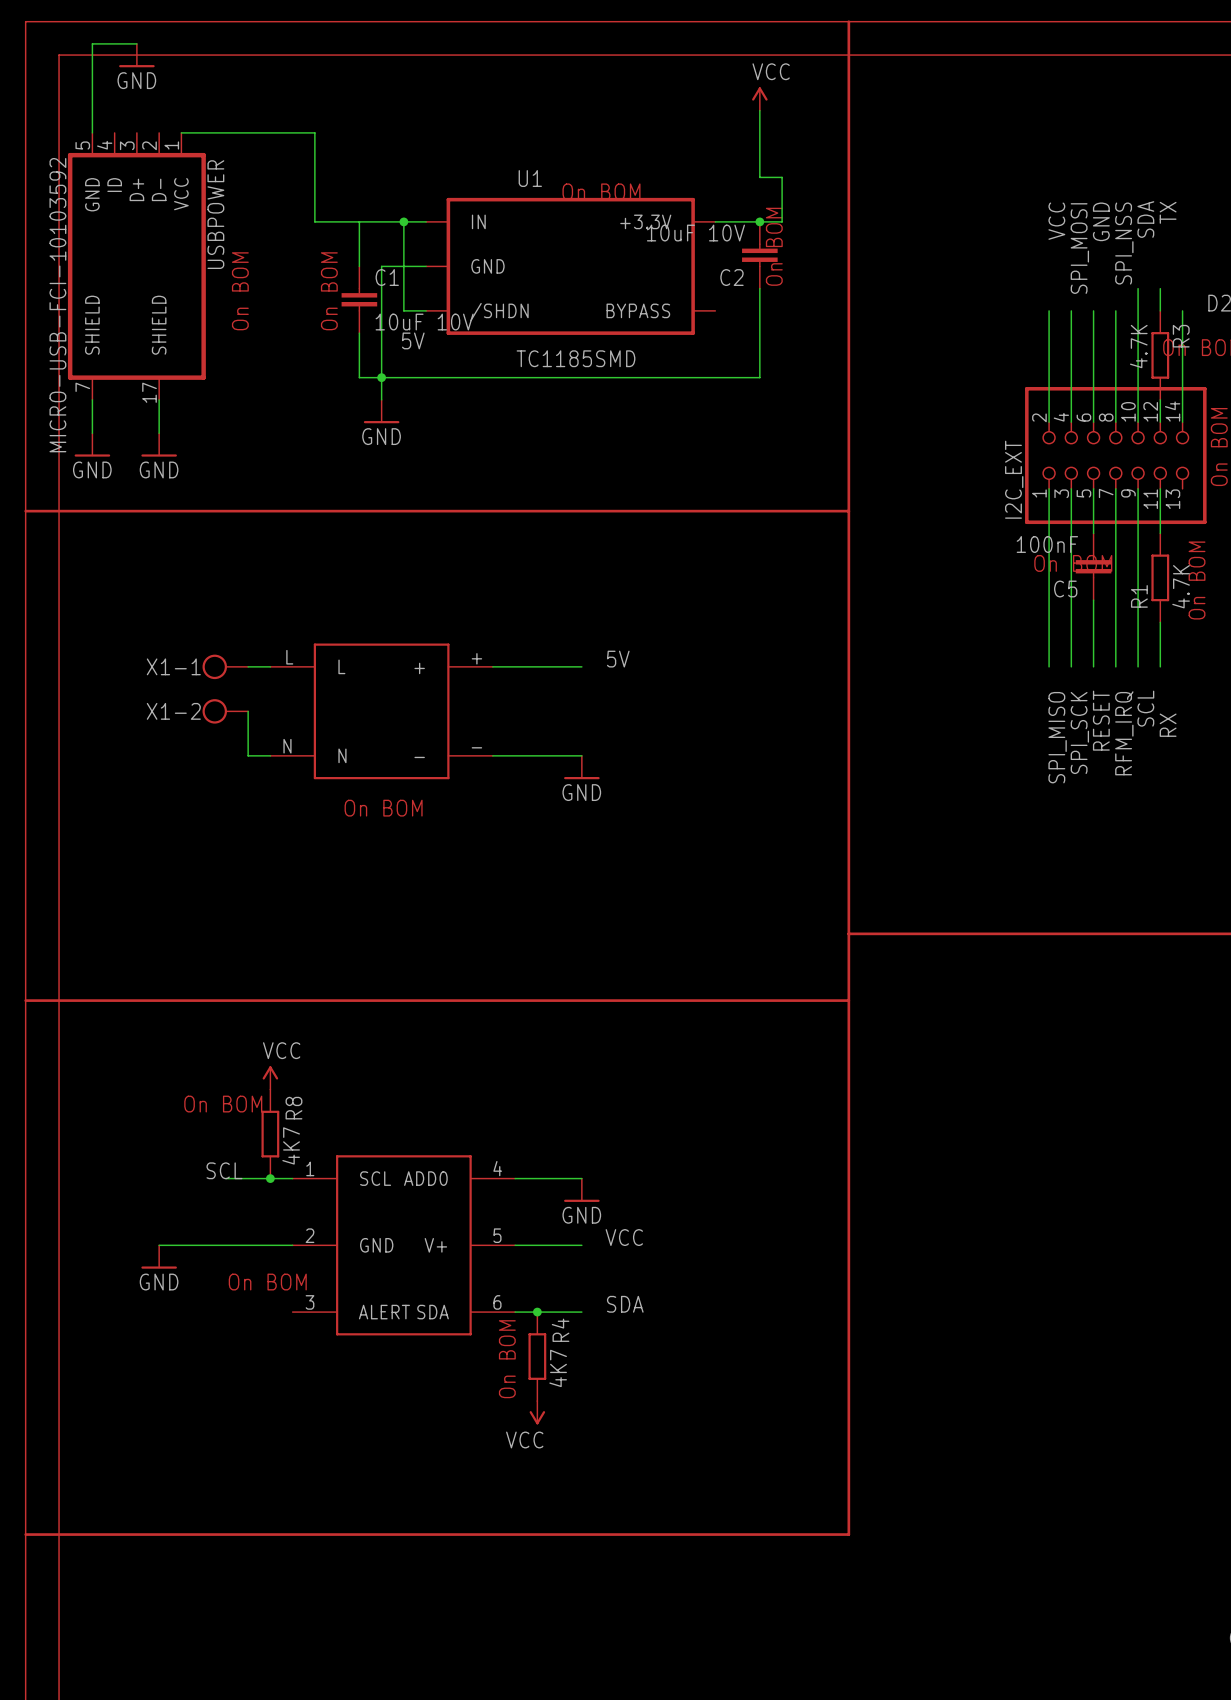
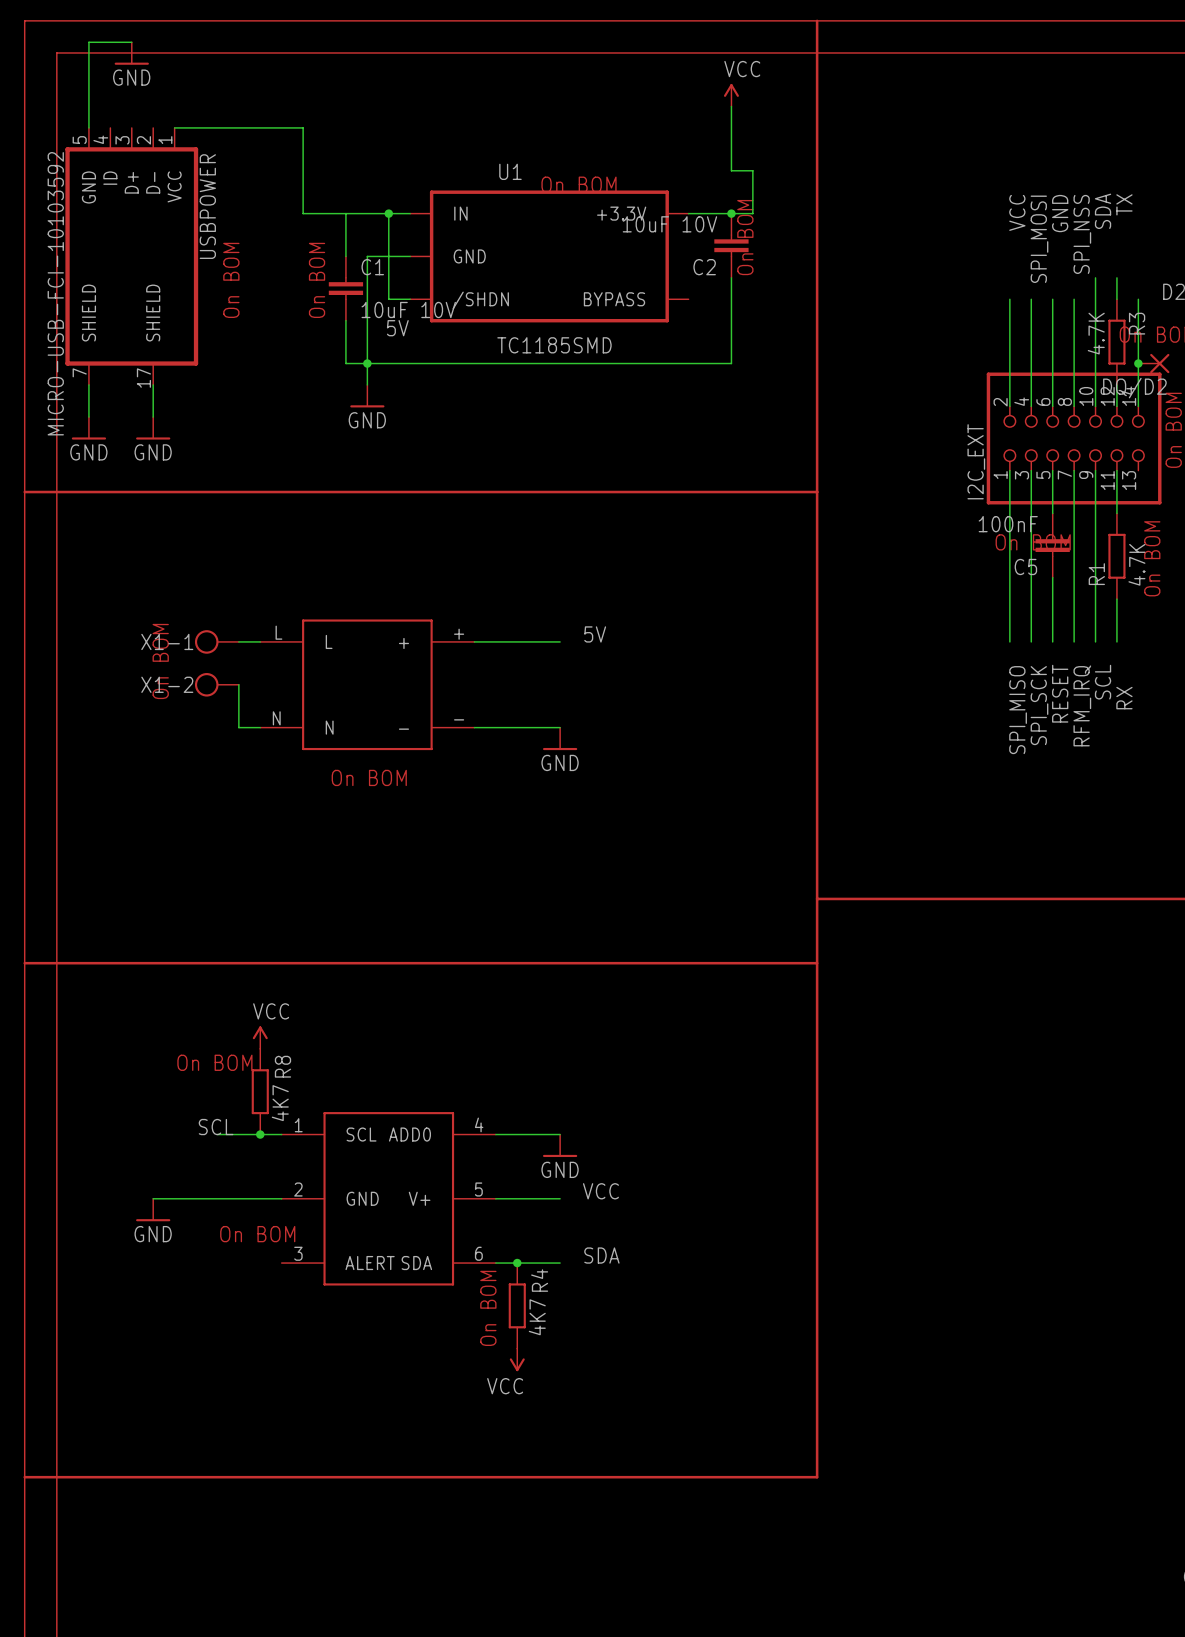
junction: none -> (1138, 363)
DQ/D2: none -> (1153, 363)
text: none -> On BOM (160, 661)

